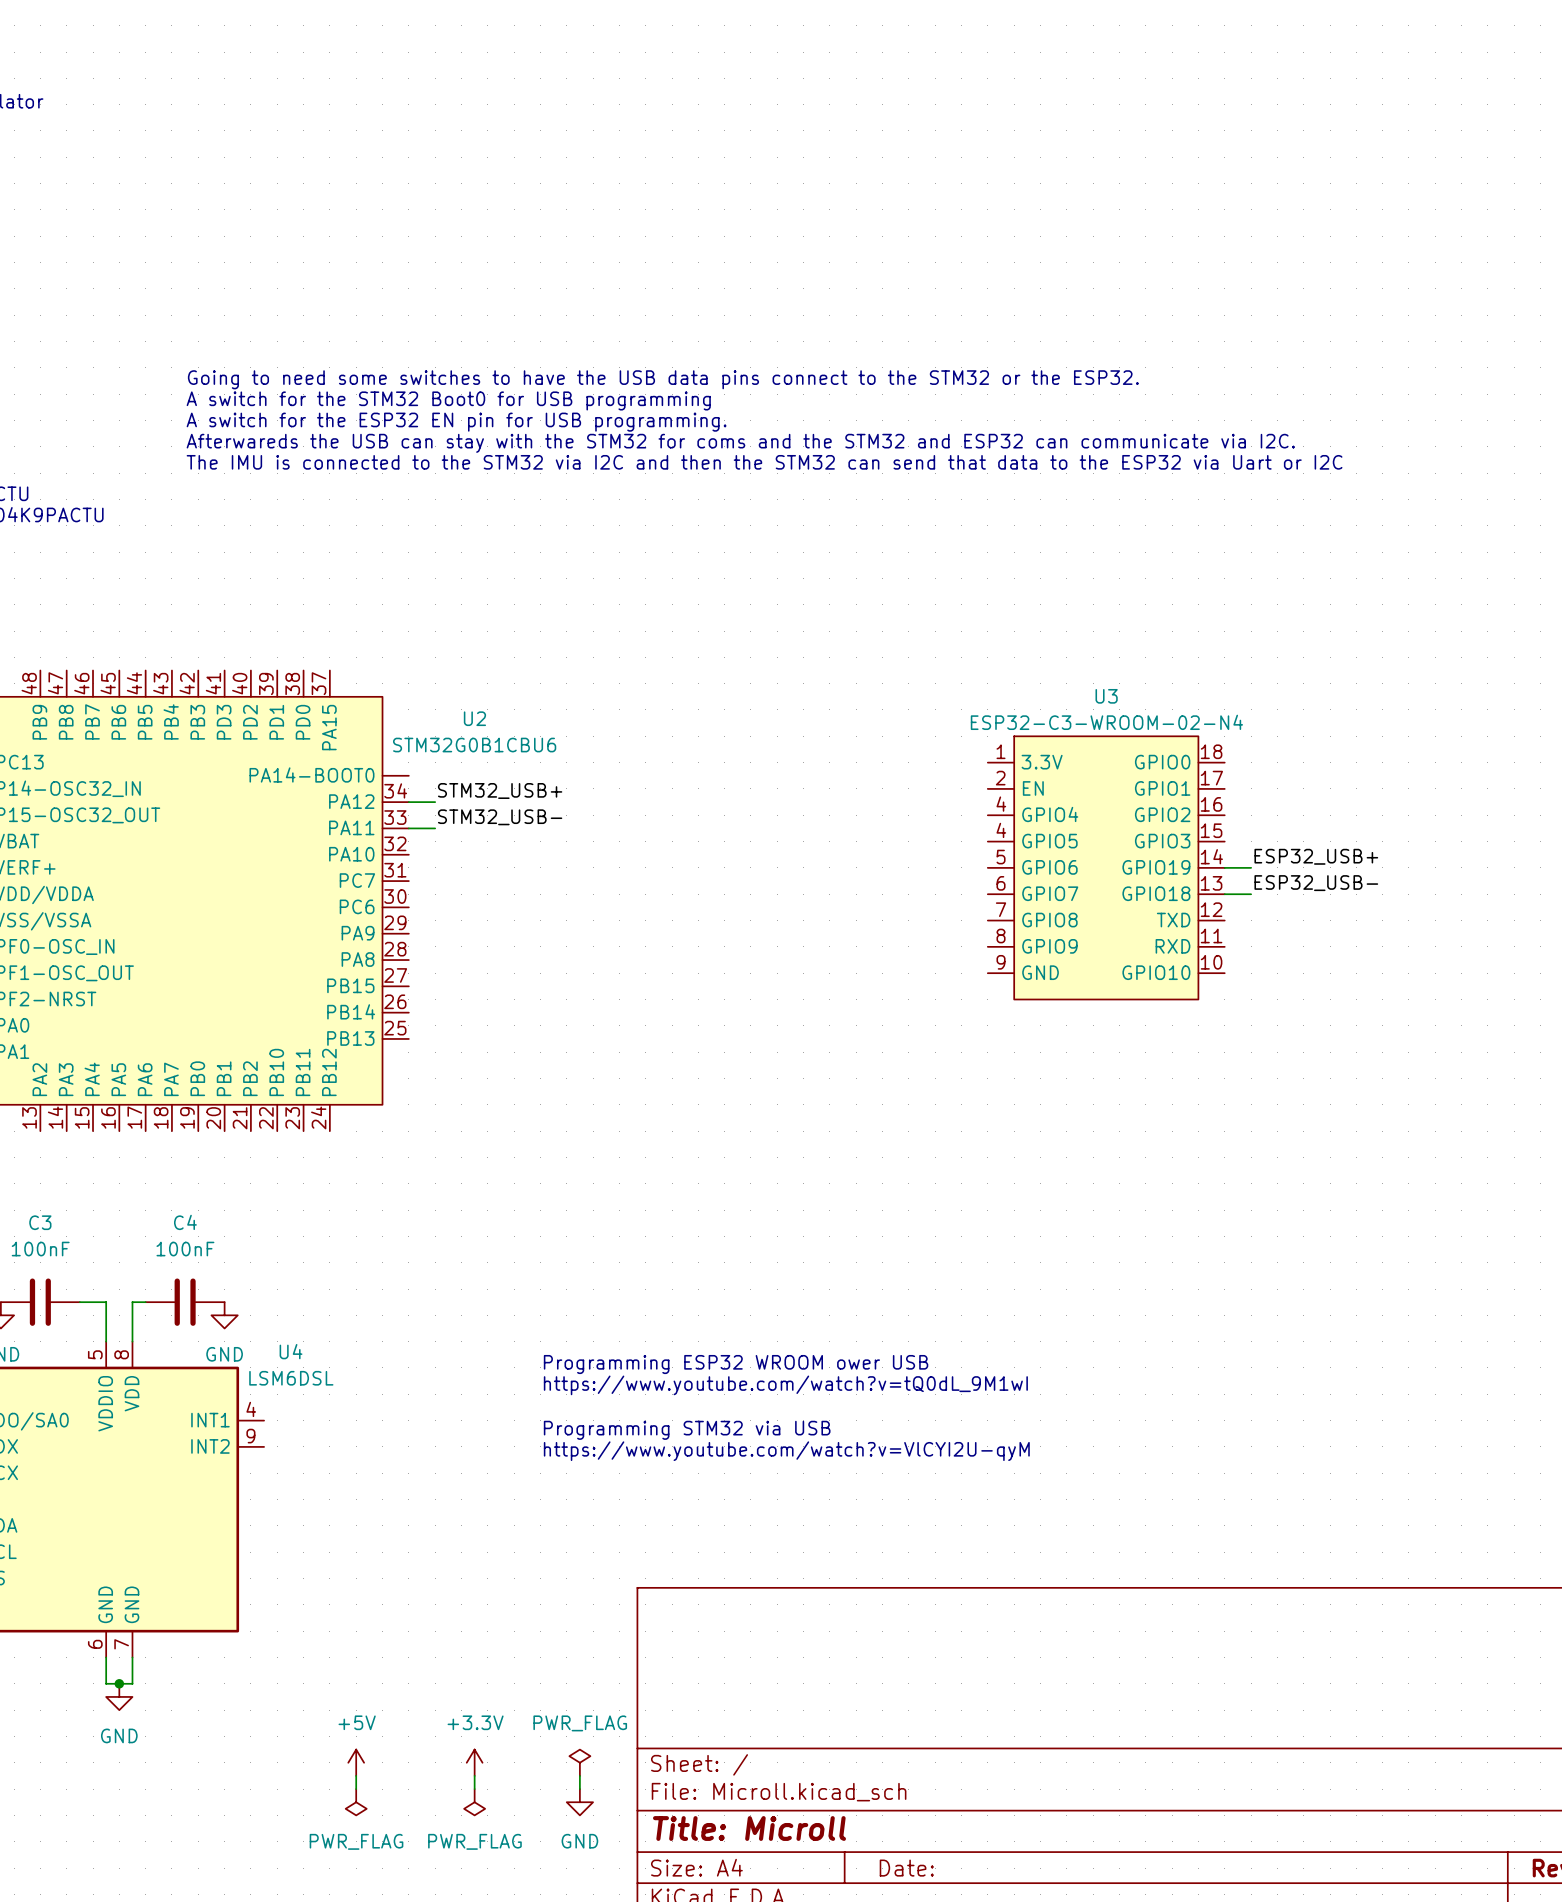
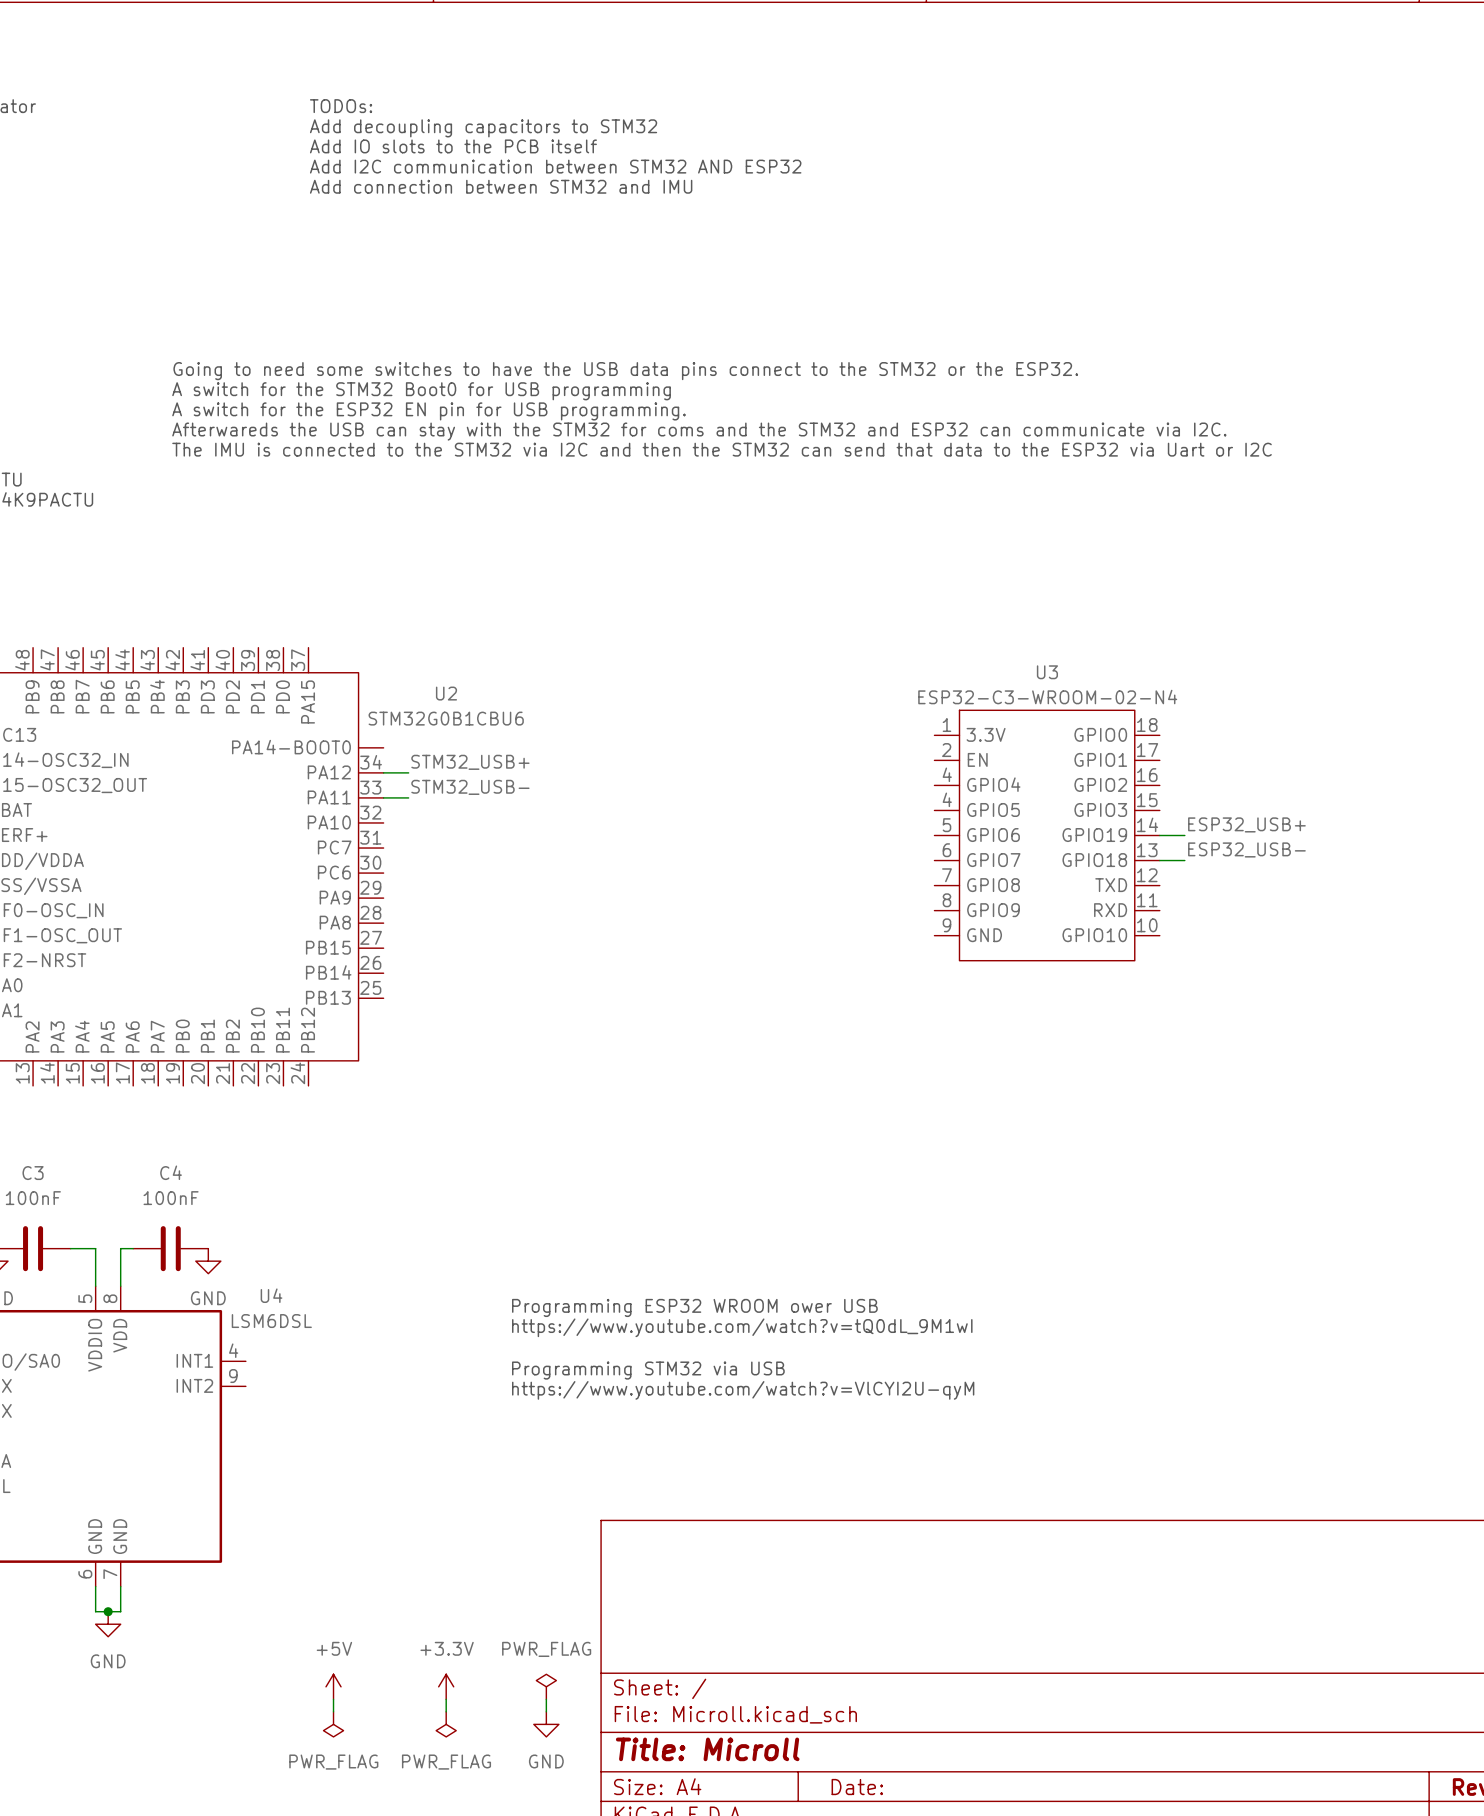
text: none -> TODOs: (341, 106)
text: none -> Add decoupling capacitors to STM32 (483, 128)
text: none -> Add IO slots to the PCB itself (453, 146)
text: none -> Add I2C communication between STM32 AND ESP32 (555, 166)
text: none -> Add connection between STM32 and IMU (501, 186)

